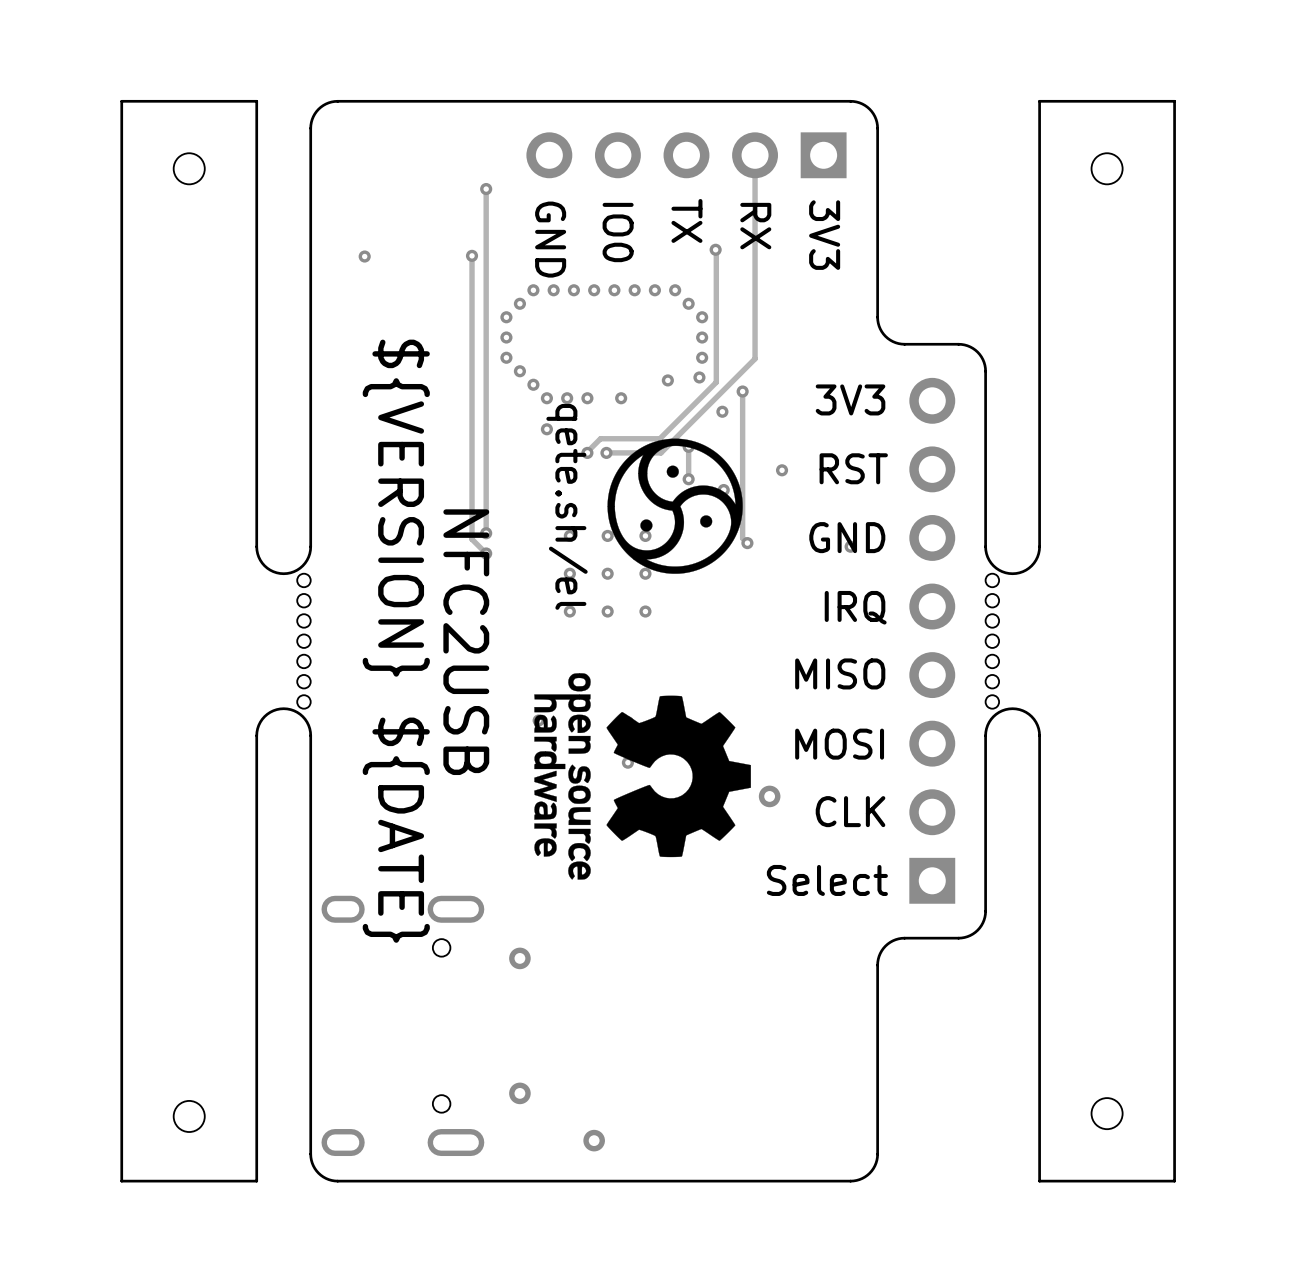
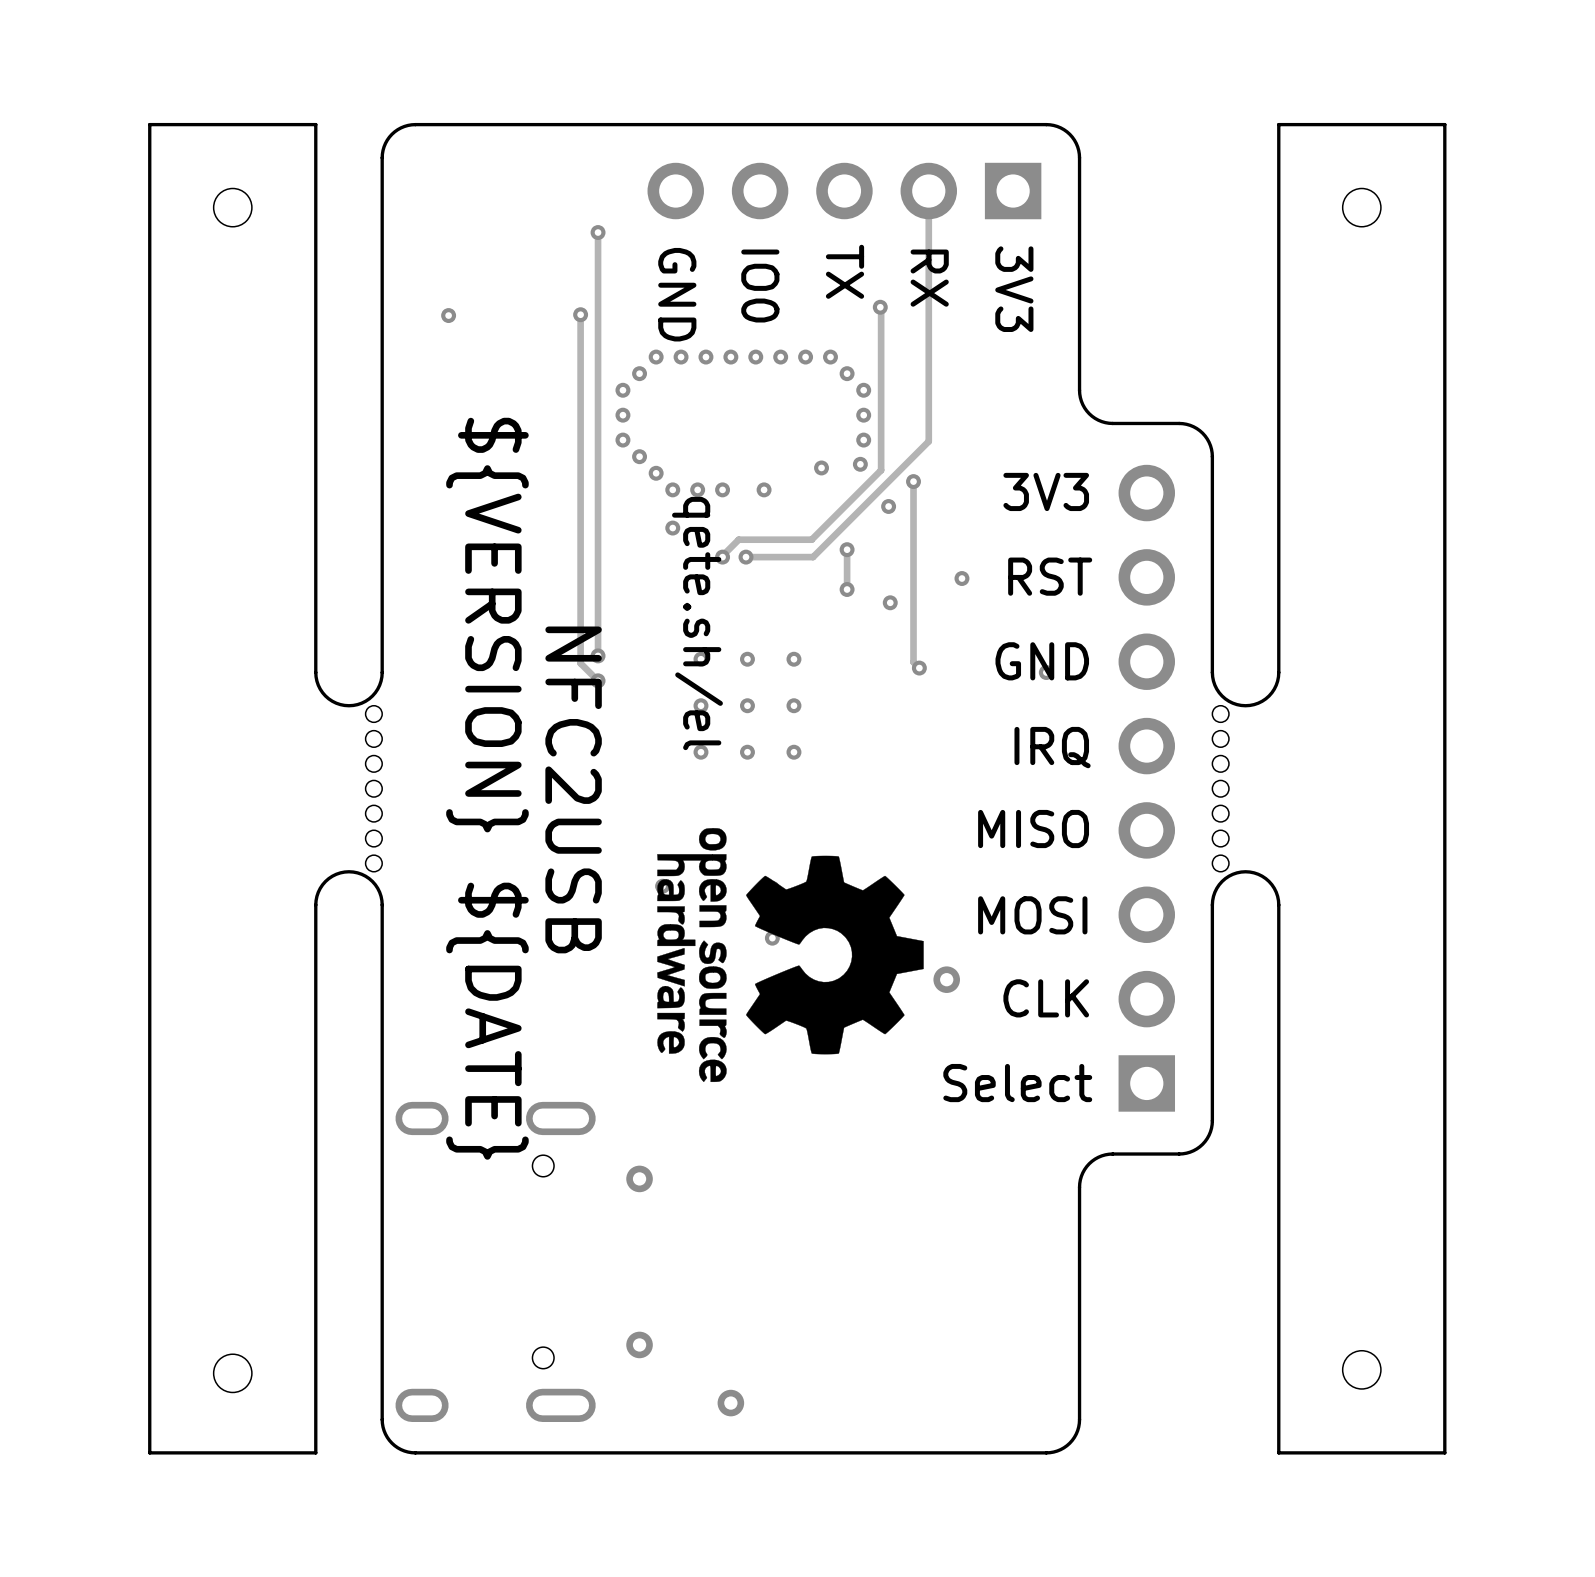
drawing: [607, 438, 743, 574] -> none

